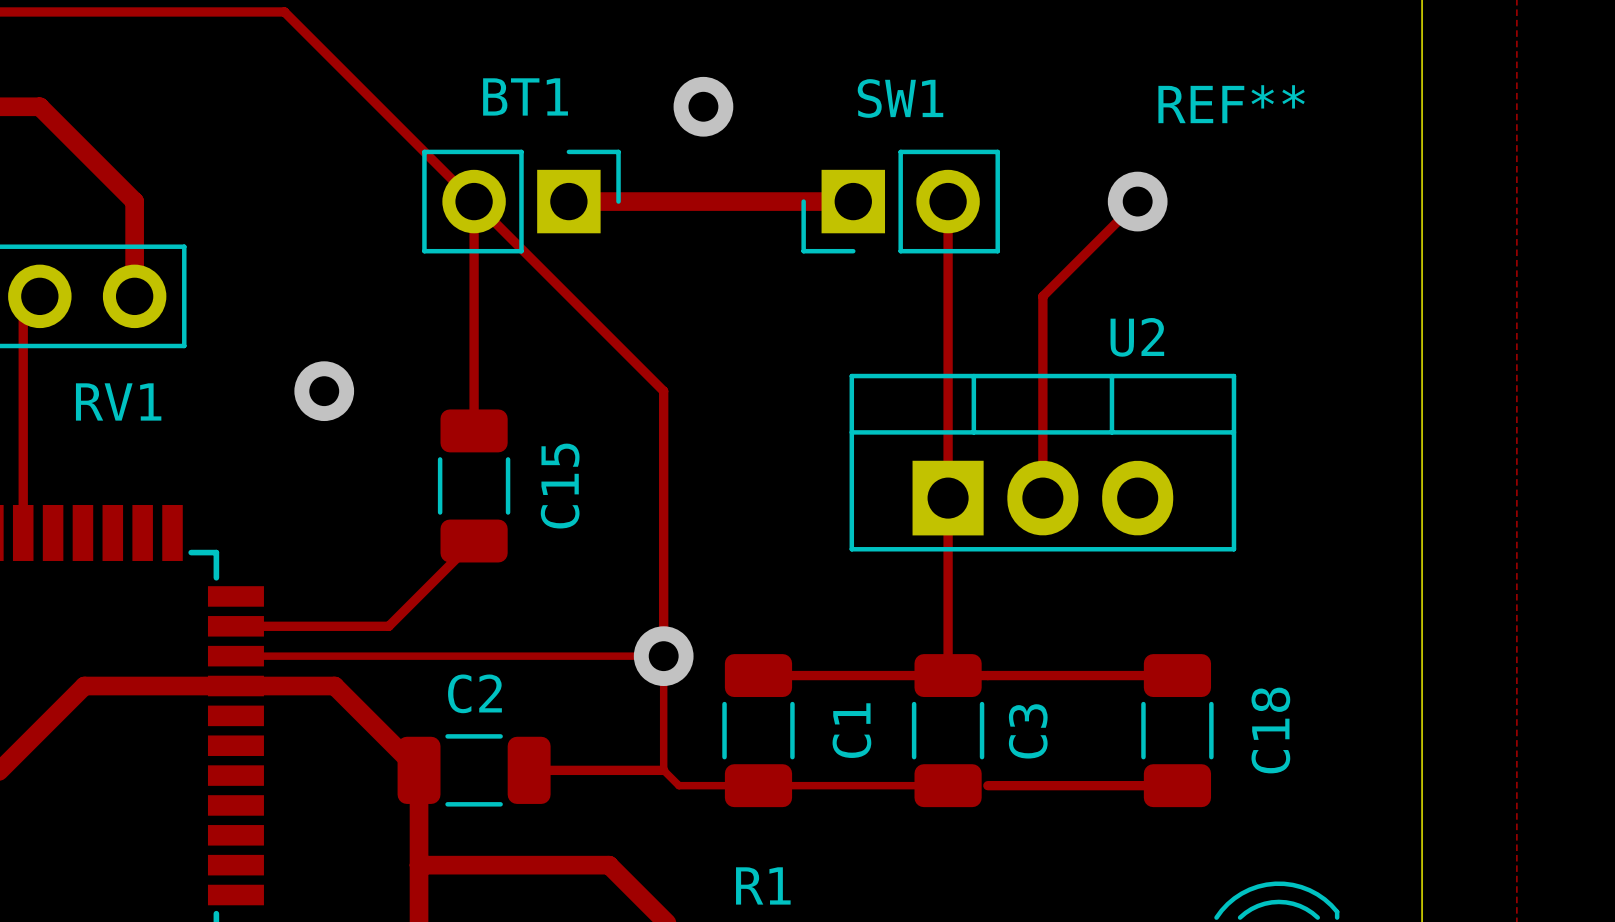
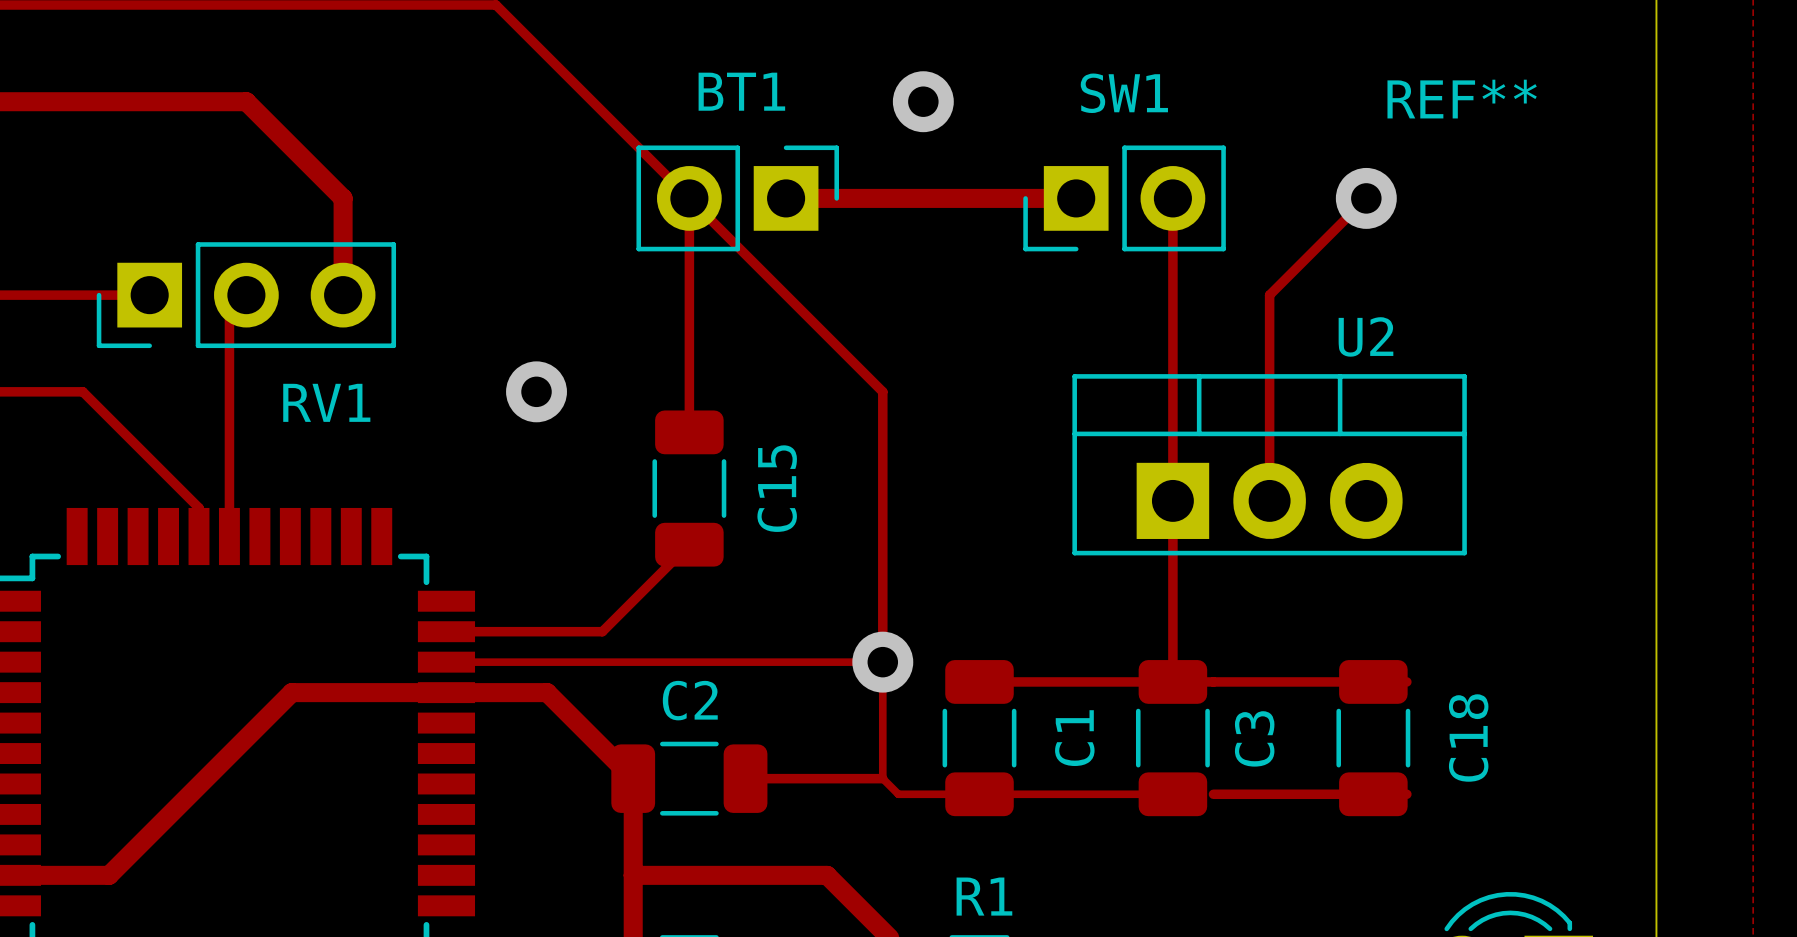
C18 position: (1177, 730) -> (1373, 738)

